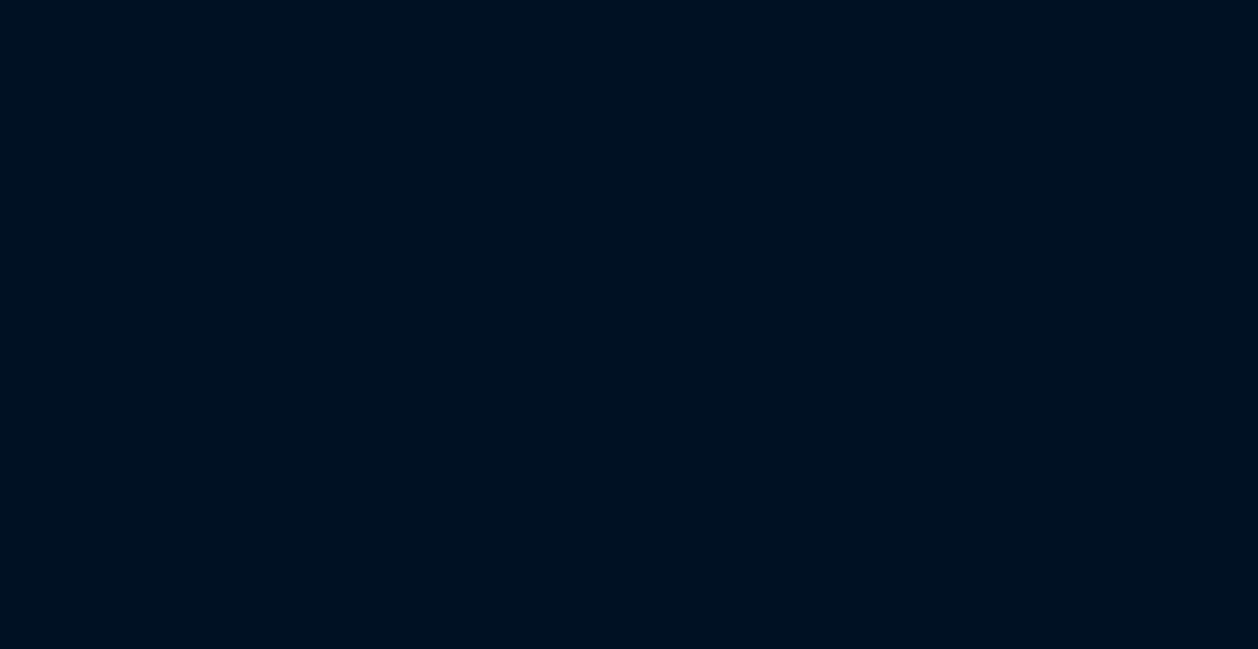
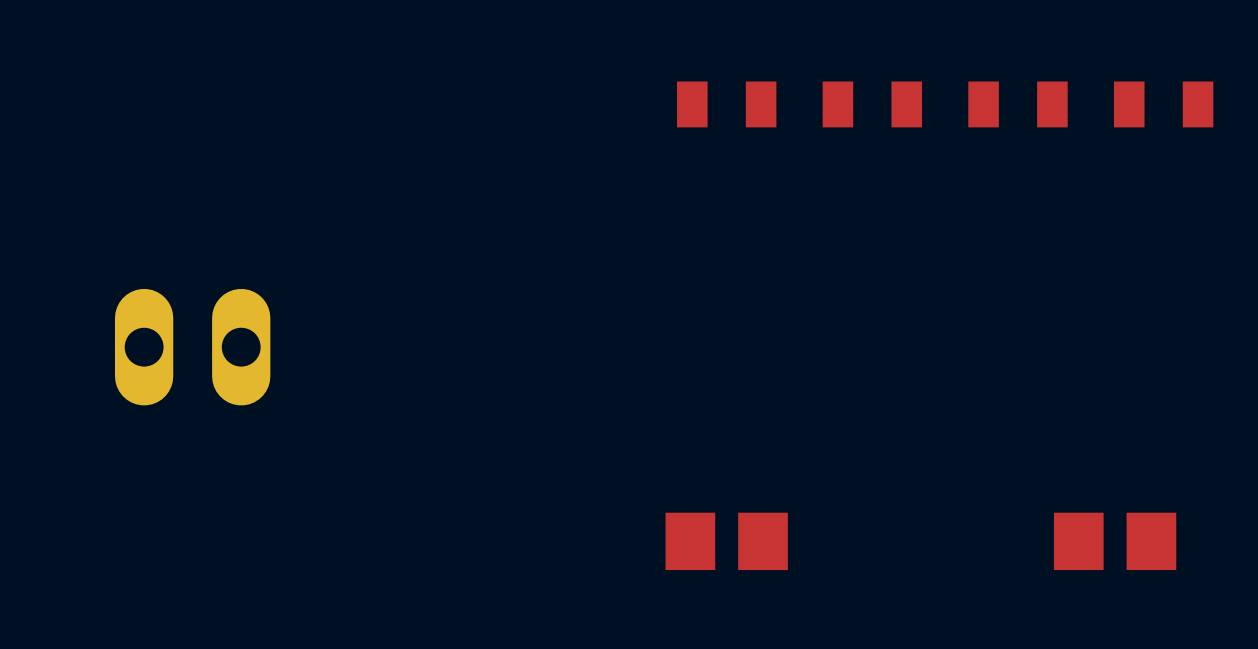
part: none -> (726, 104)
part: none -> (872, 104)
part: none -> (1017, 104)
part: none -> (1163, 104)
part: none -> (192, 347)
part: none -> (726, 541)
part: none -> (1115, 541)

